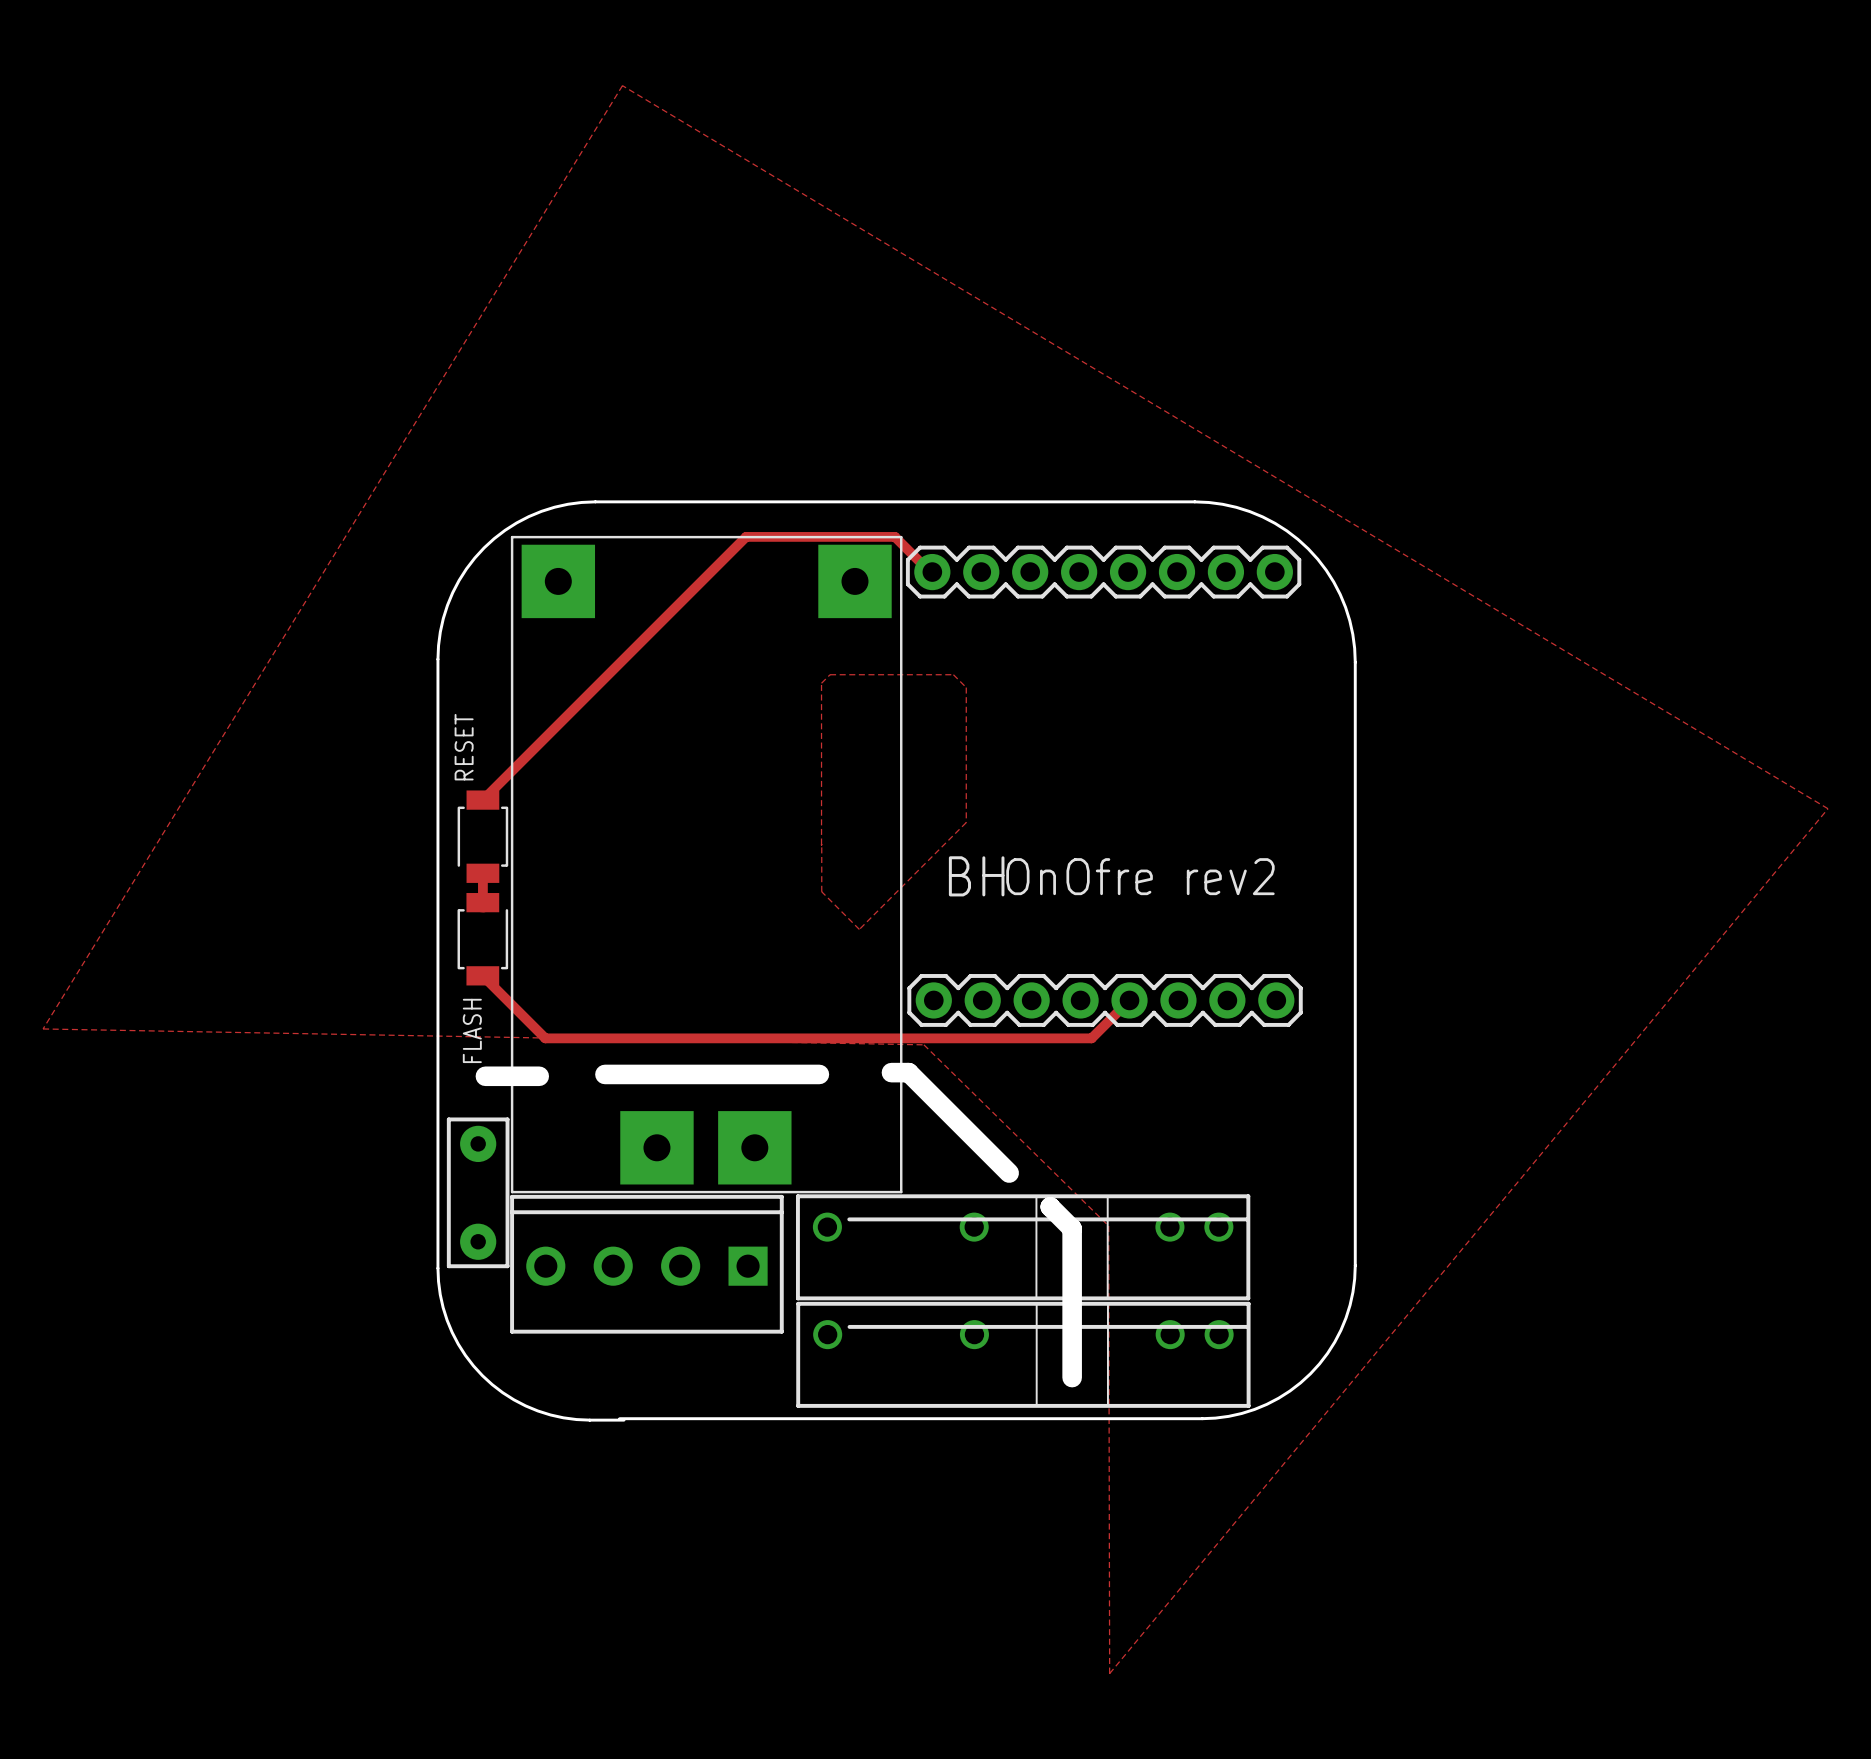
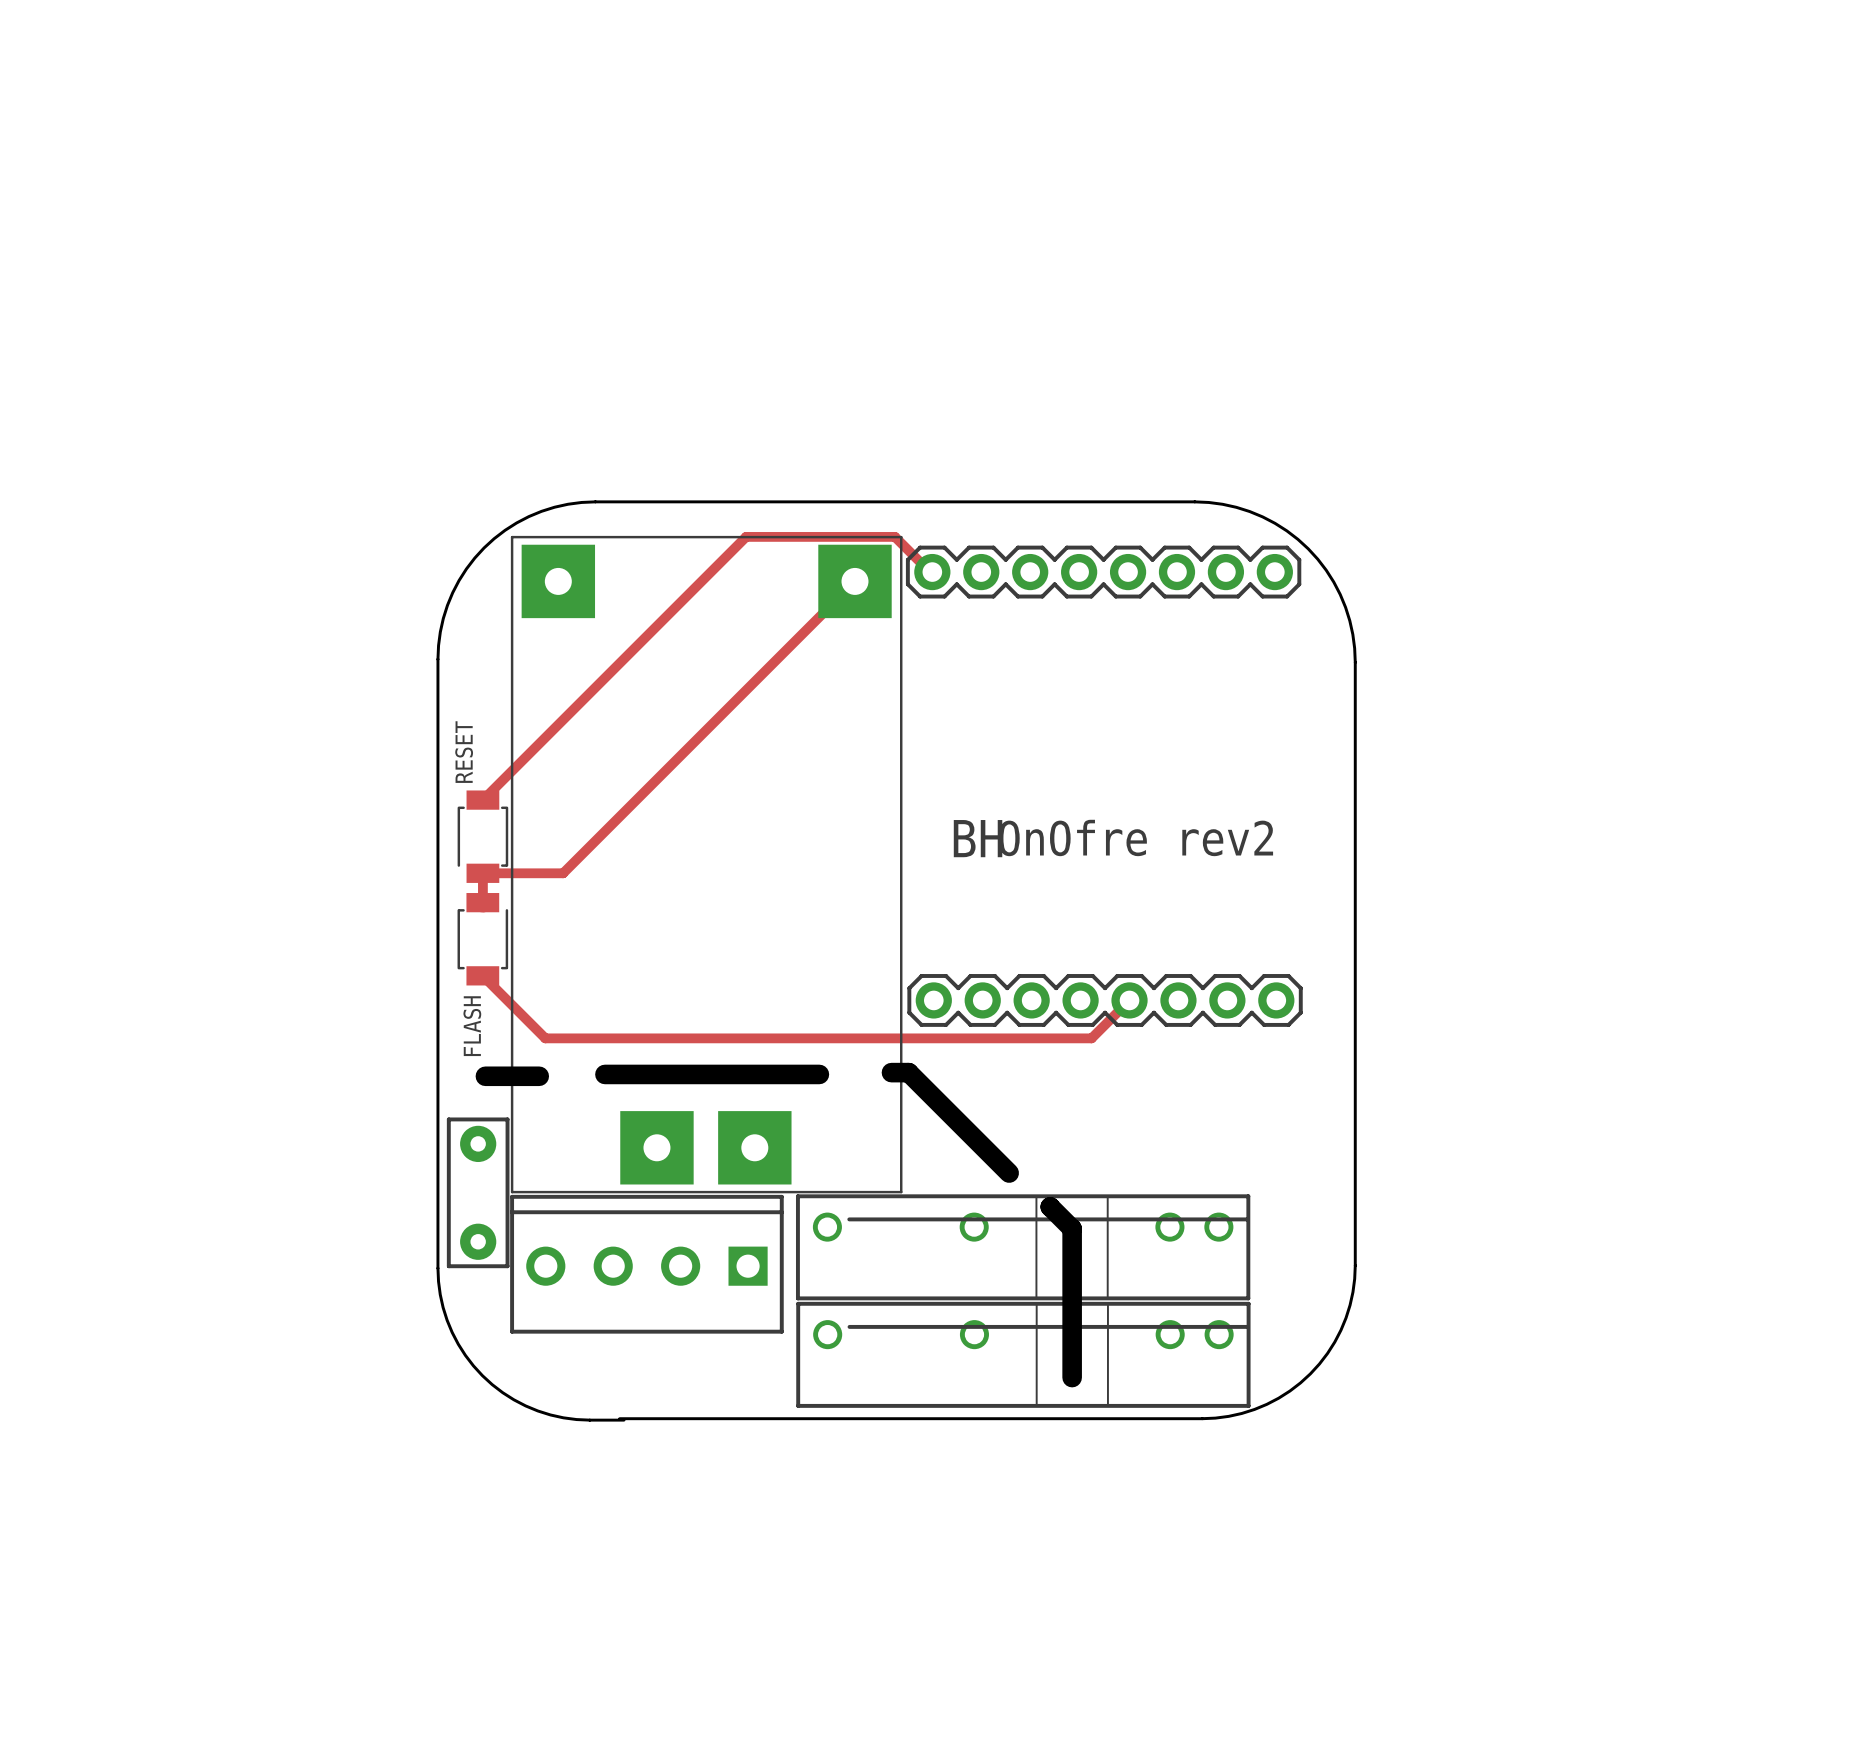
zone outline: (622, 85) (43, 1028) (923, 1044) (1108, 1225) (1109, 1673) (1827, 808) (622, 85) -> none
track: none -> (854, 581) (563, 873) (482, 873)
zone outline: (821, 844) (821, 891) (859, 929) (966, 822) (966, 687) (953, 674) (830, 674) (821, 683) (821, 845) -> none
text position: BH (976, 876) -> BH (978, 838)
text position: OnOfre rev2 (1140, 876) -> OnOfre rev2 (1136, 837)

